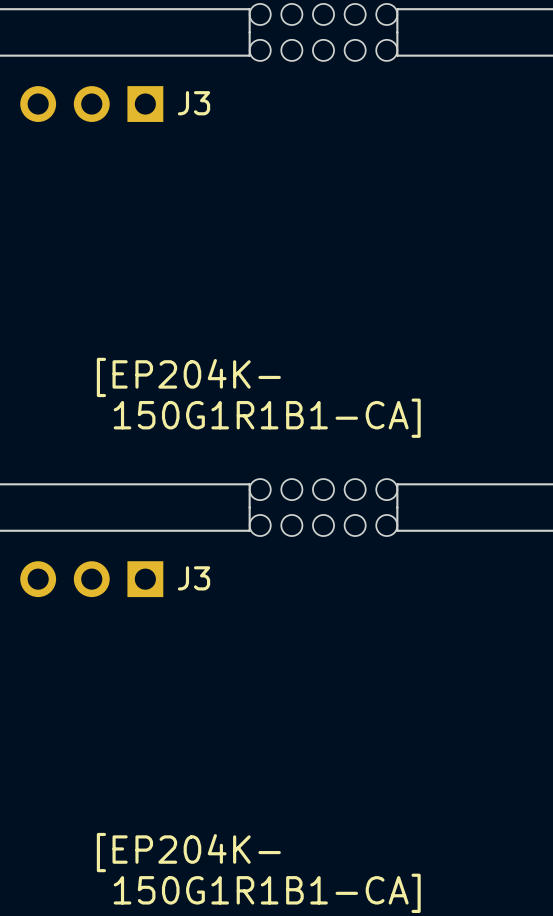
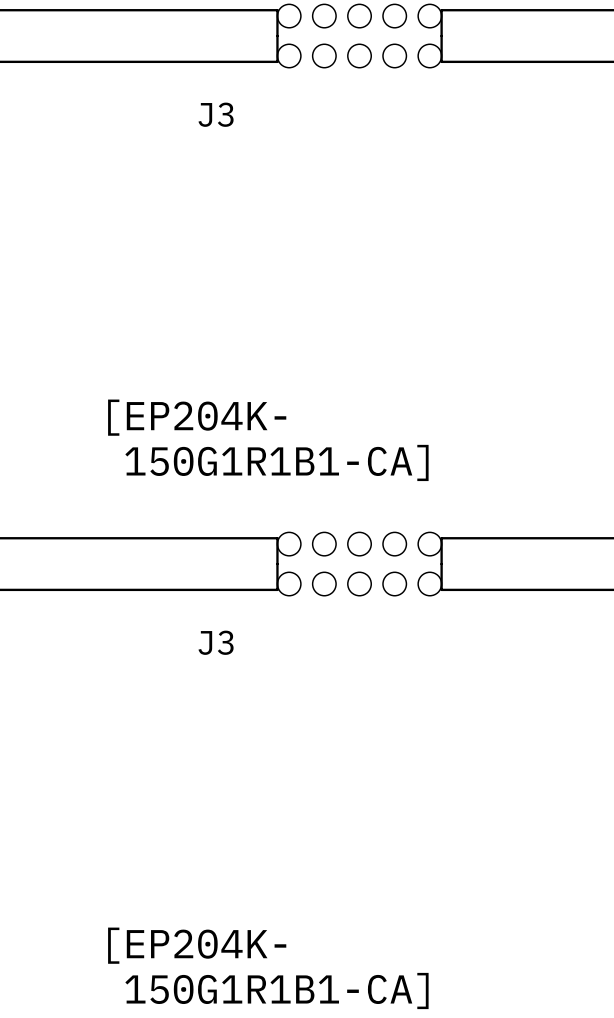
J3: (91, 104) -> none
J3: (91, 579) -> none

